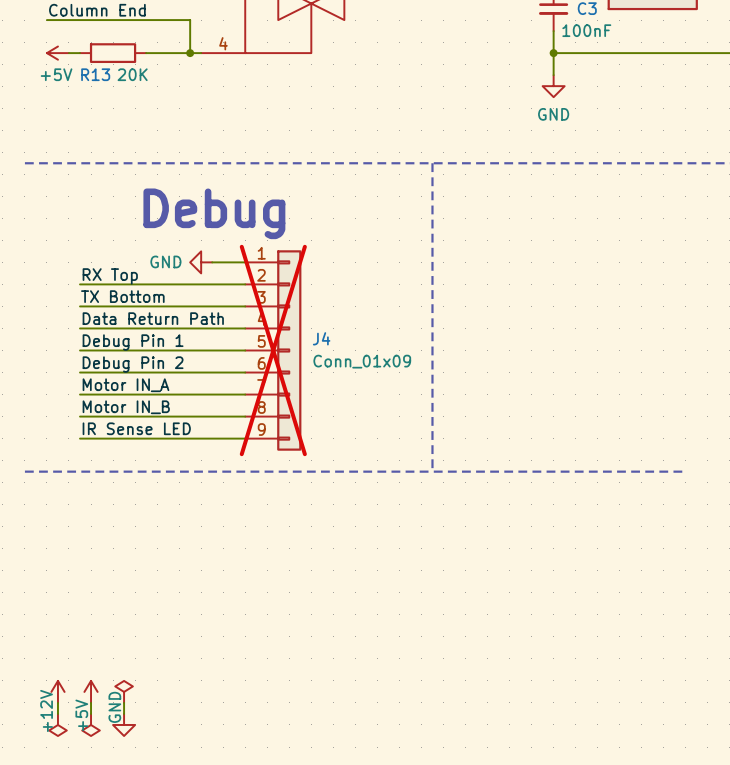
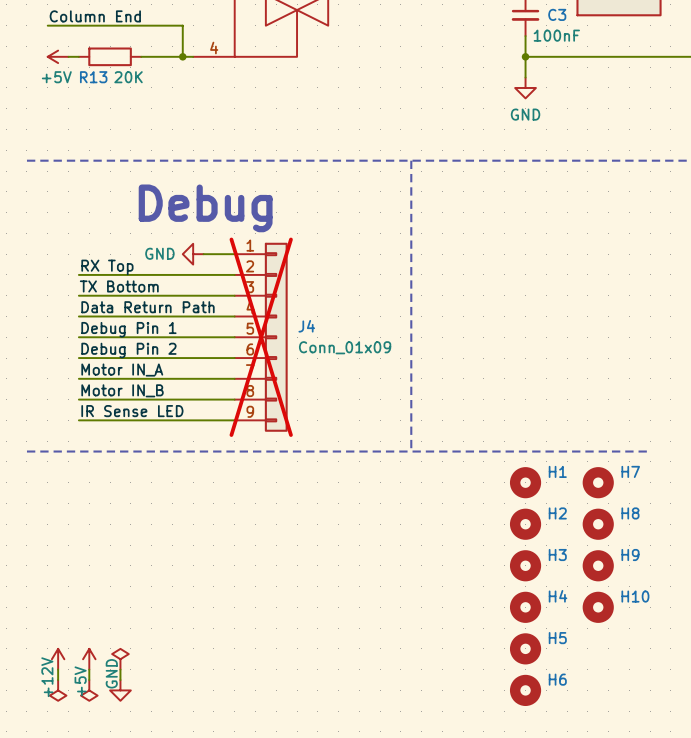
H1: none -> (525, 482)
H7: none -> (598, 482)
H2: none -> (525, 524)
H8: none -> (598, 524)
H3: none -> (525, 565)
H9: none -> (598, 565)
H4: none -> (525, 607)
H10: none -> (598, 607)
H5: none -> (525, 648)
H6: none -> (525, 690)

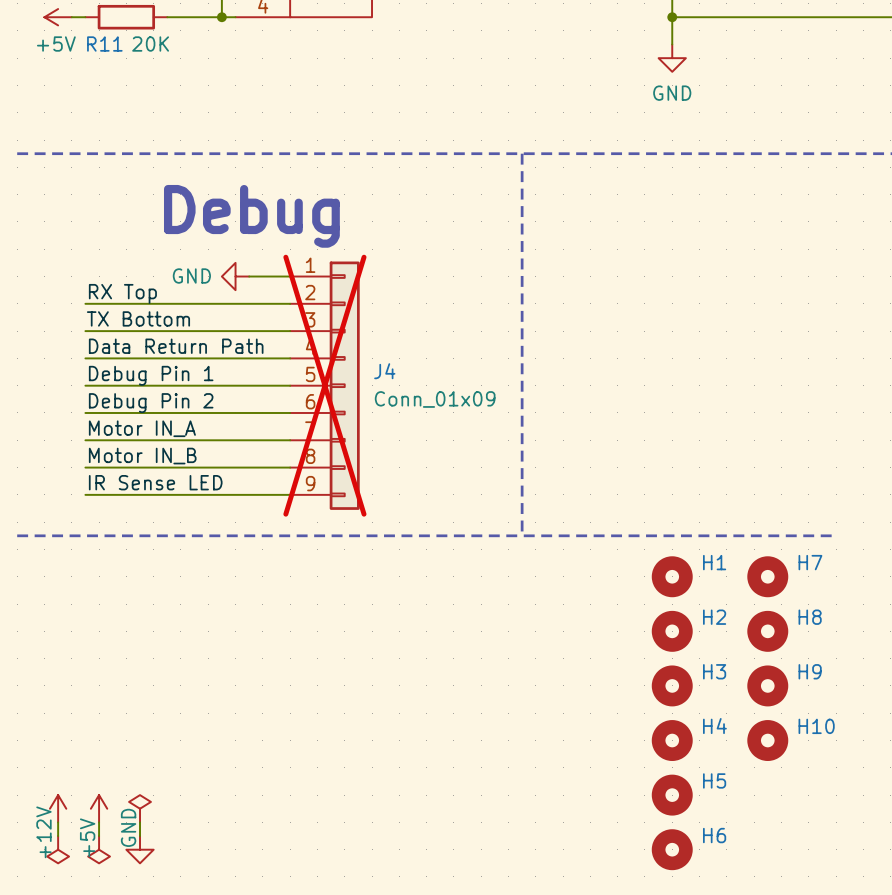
R13 name: R13 (93, 77) -> R11 (104, 44)

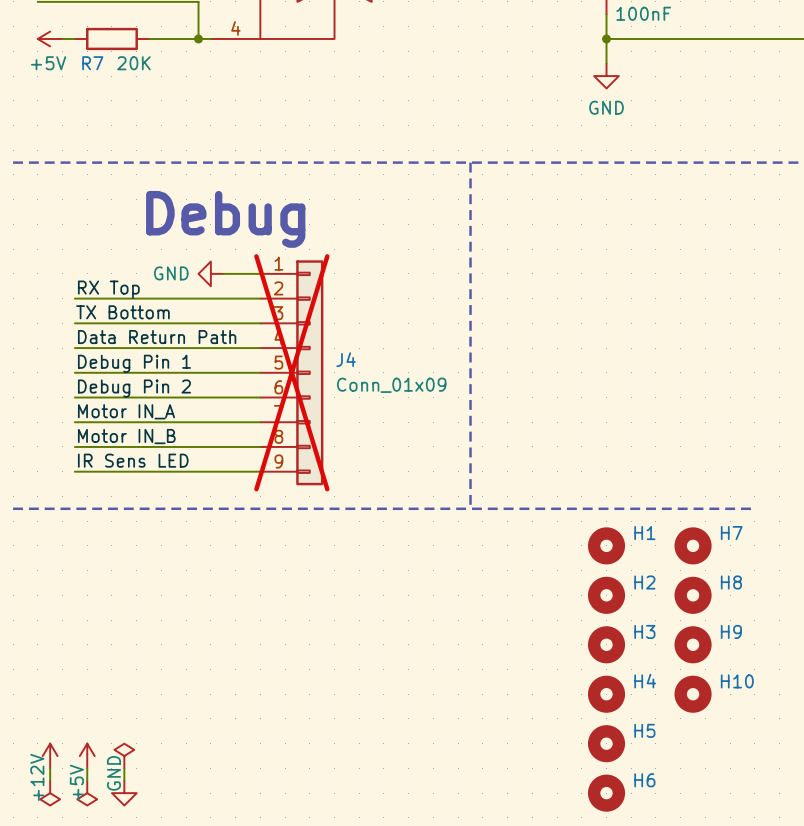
R11 name: R11 (104, 44) -> R7 (92, 63)
label: IR Sense LED (155, 482) -> IR Sens LED (133, 460)

